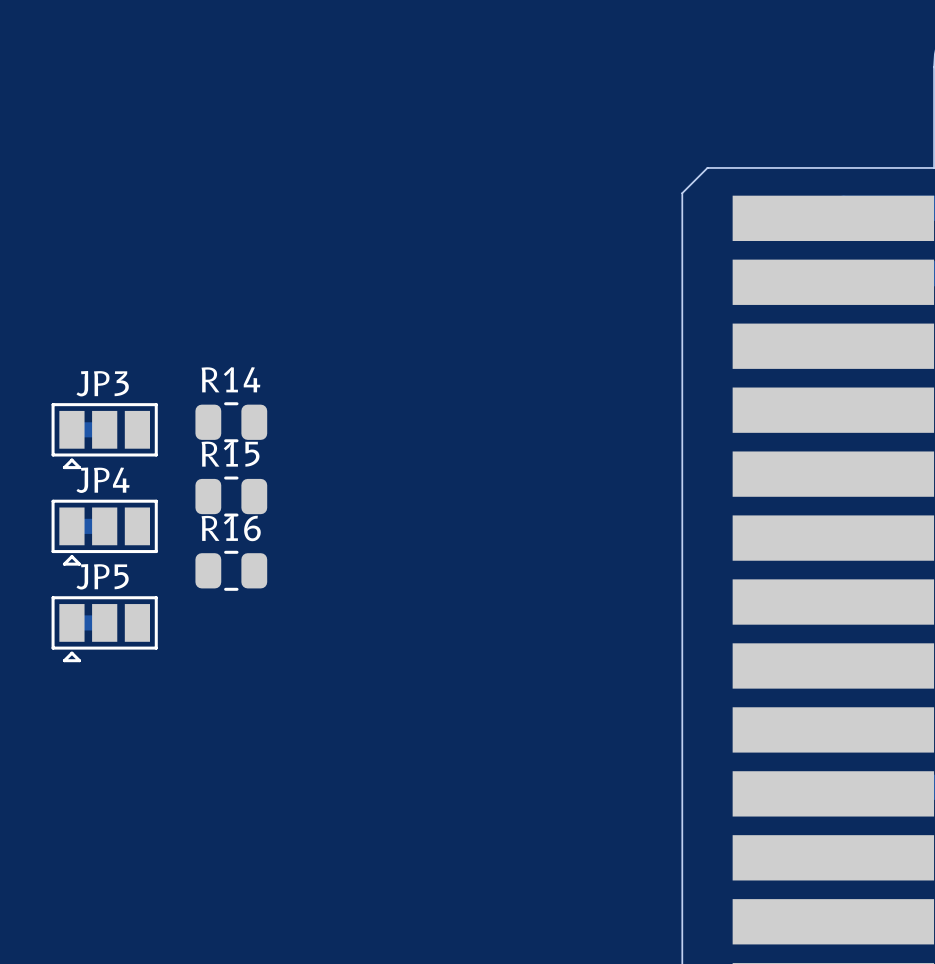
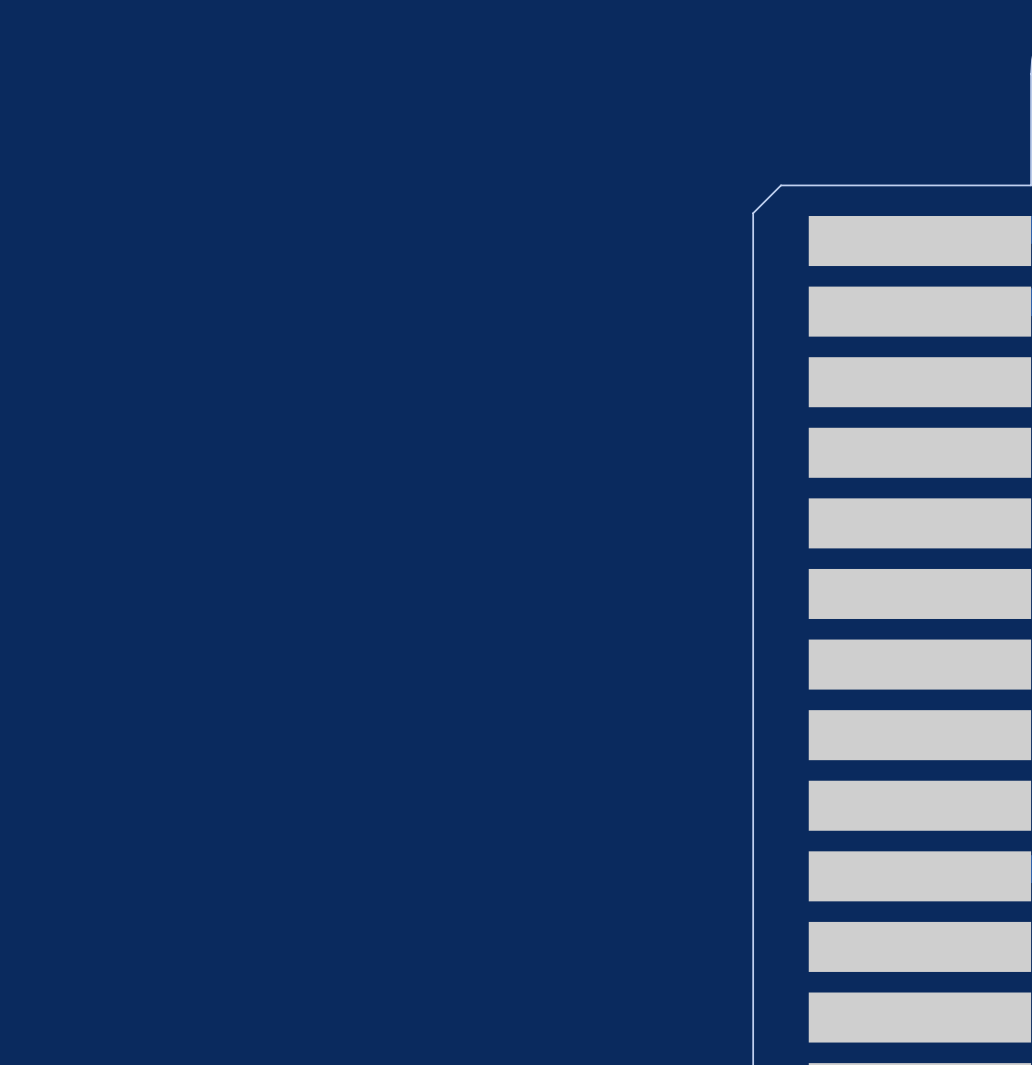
R14: (231, 422) -> none
JP3: (104, 436) -> none
R15: (231, 496) -> none
JP4: (104, 532) -> none
R16: (231, 570) -> none
JP5: (104, 629) -> none

